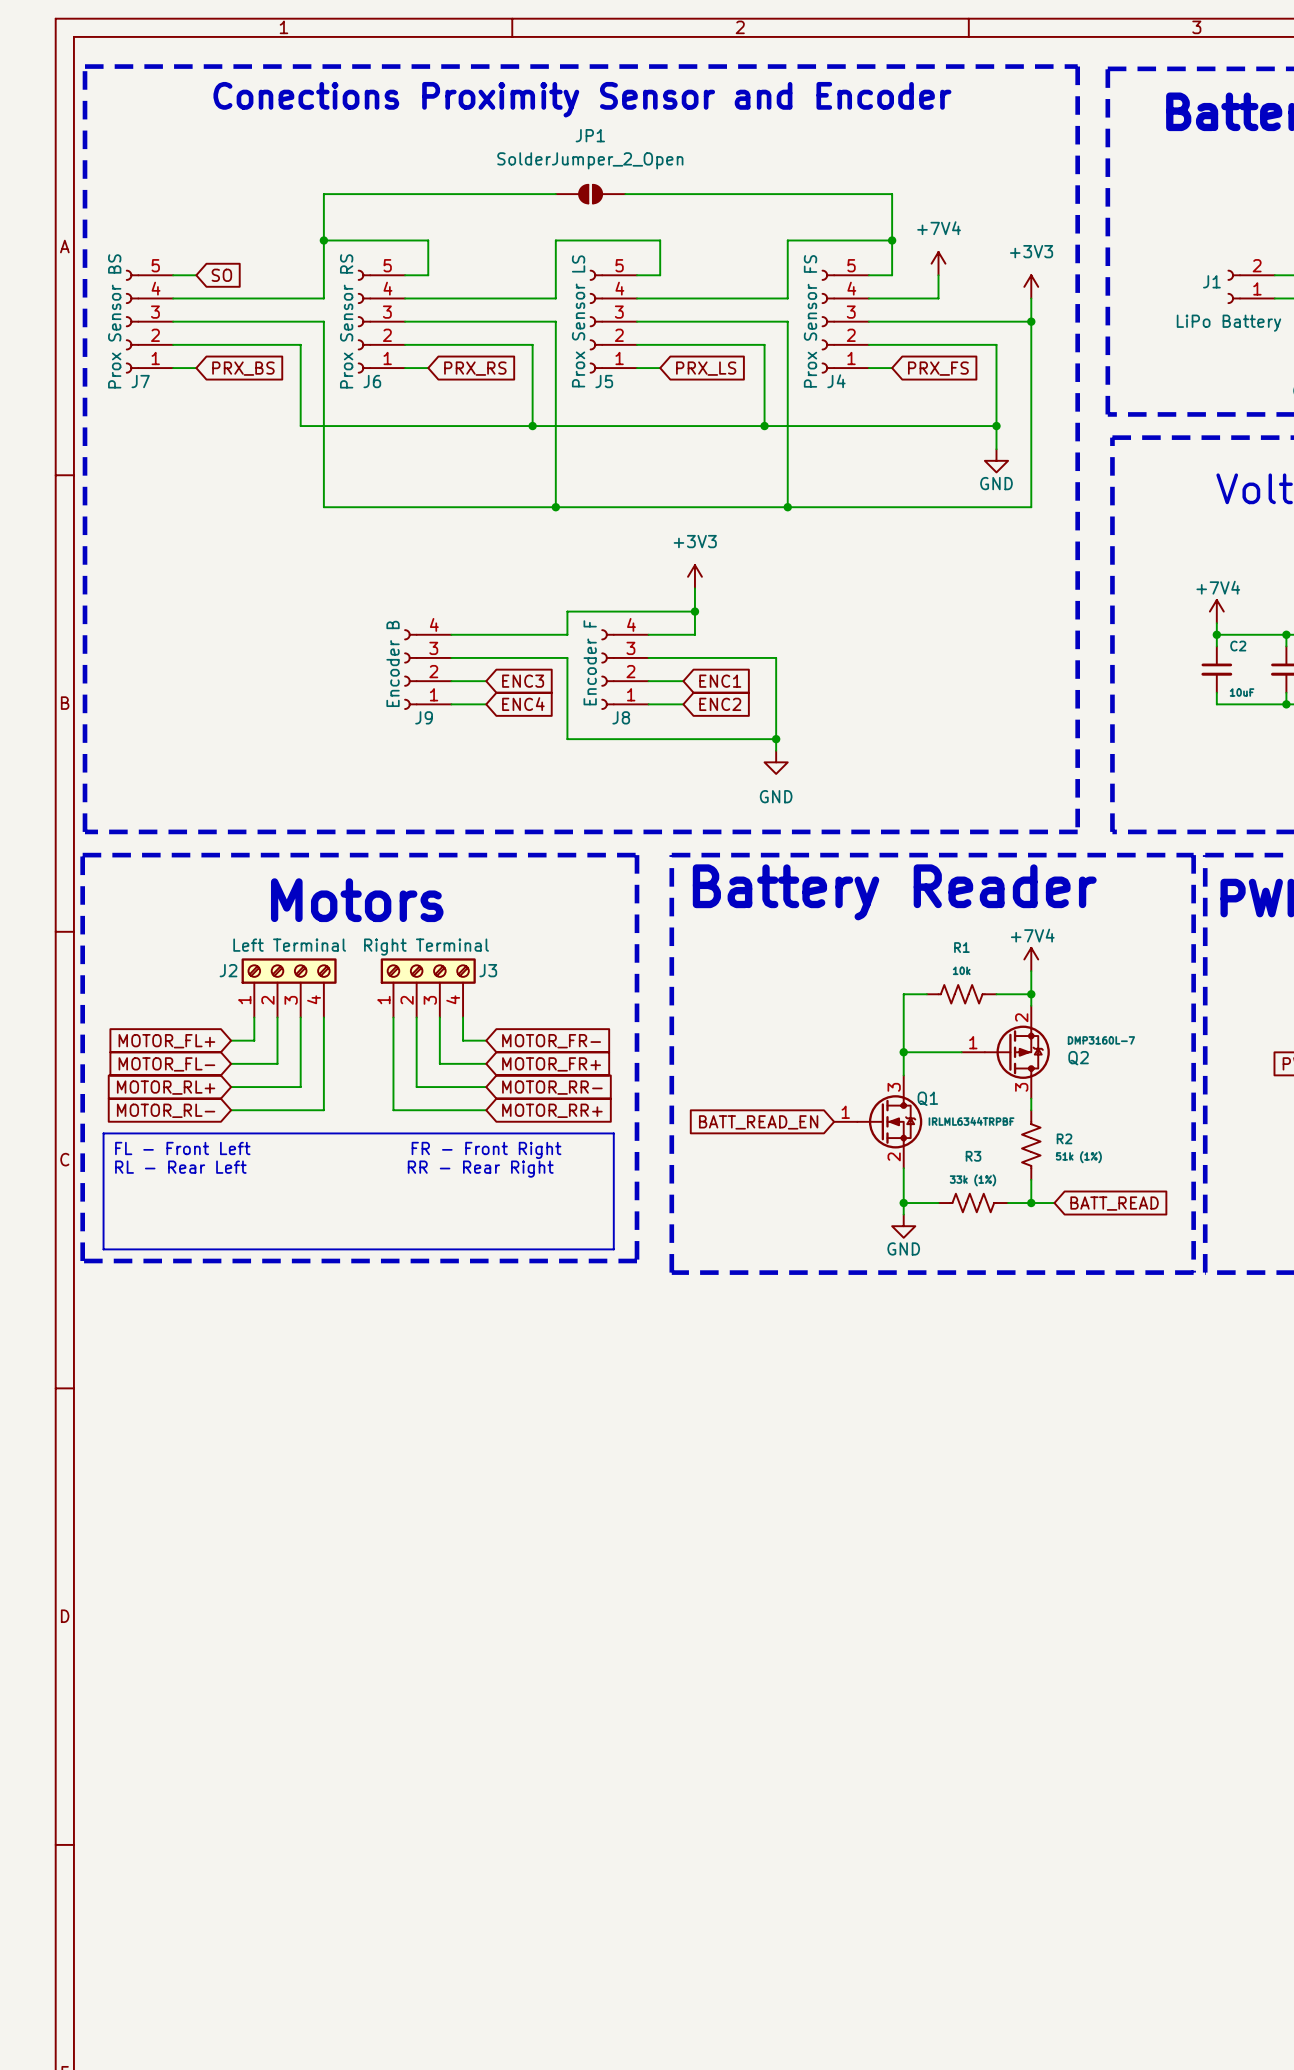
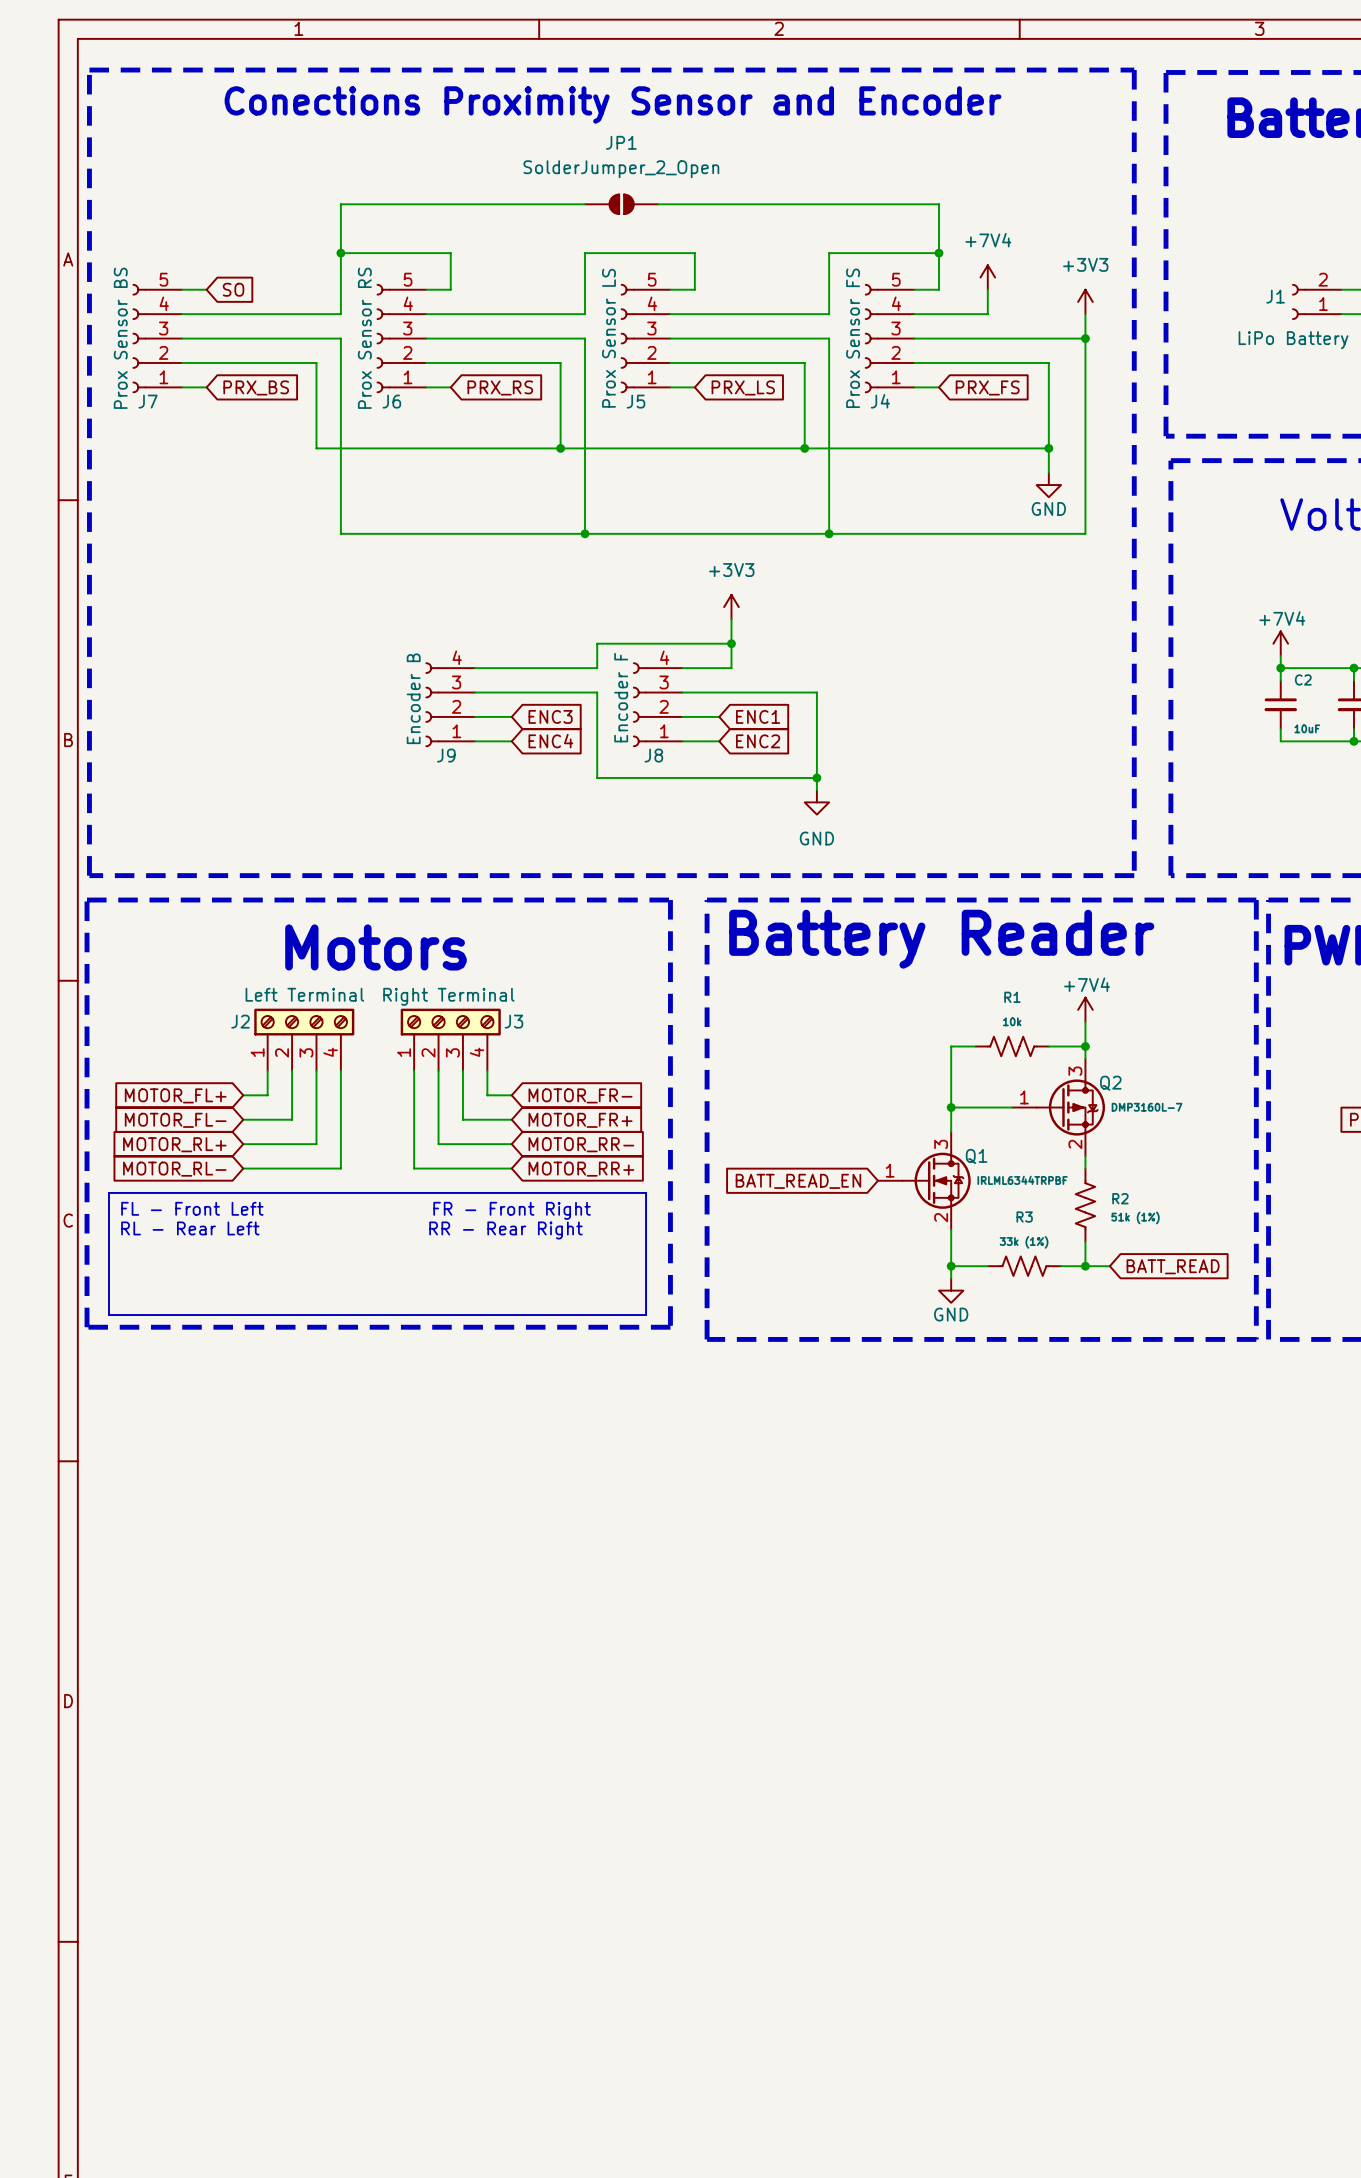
Q2 flip: as is (1017, 1052) -> up-down (1070, 1107)
Q2 name position: Q2 (1078, 1058) -> Q2 (1110, 1083)

